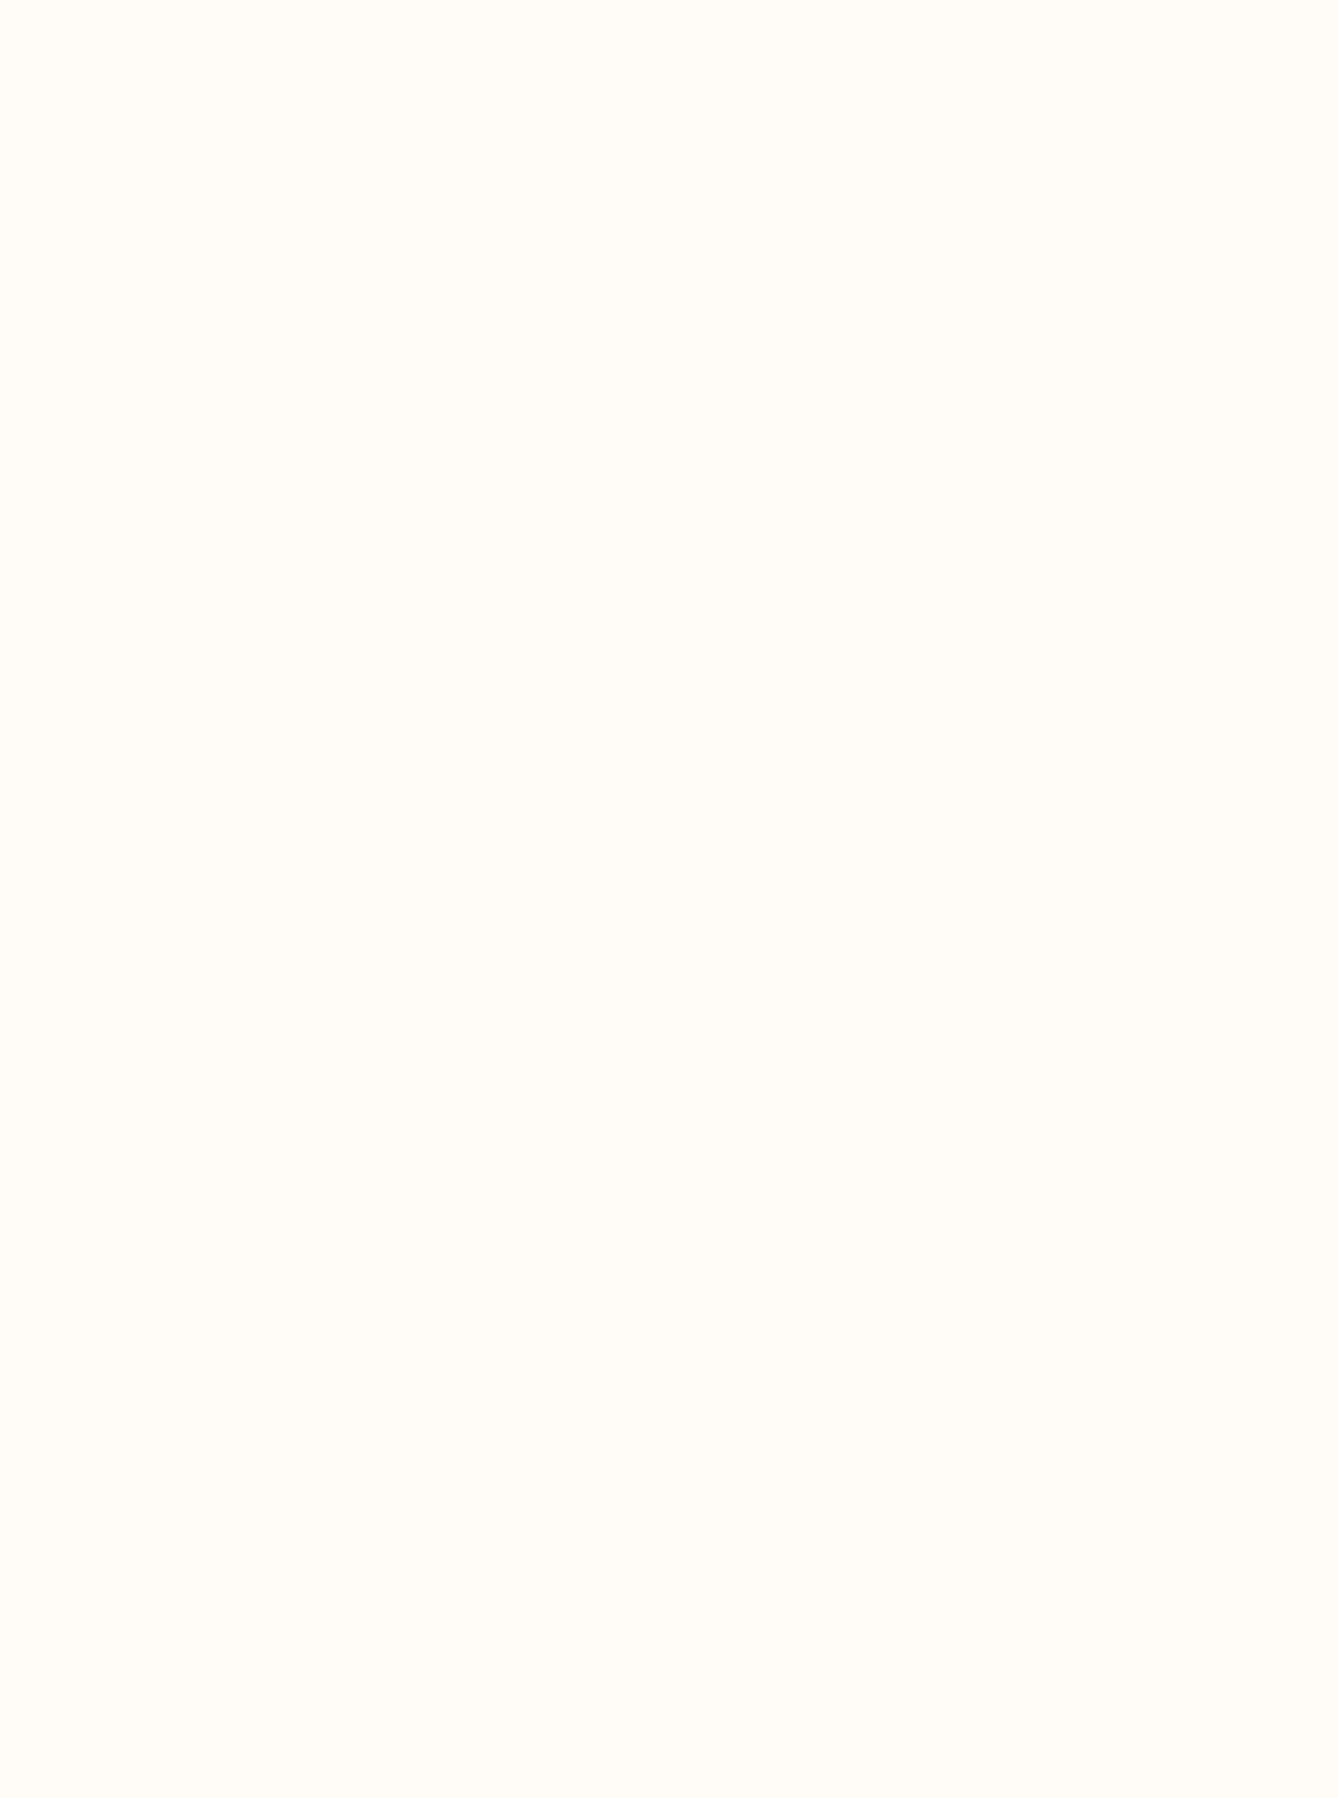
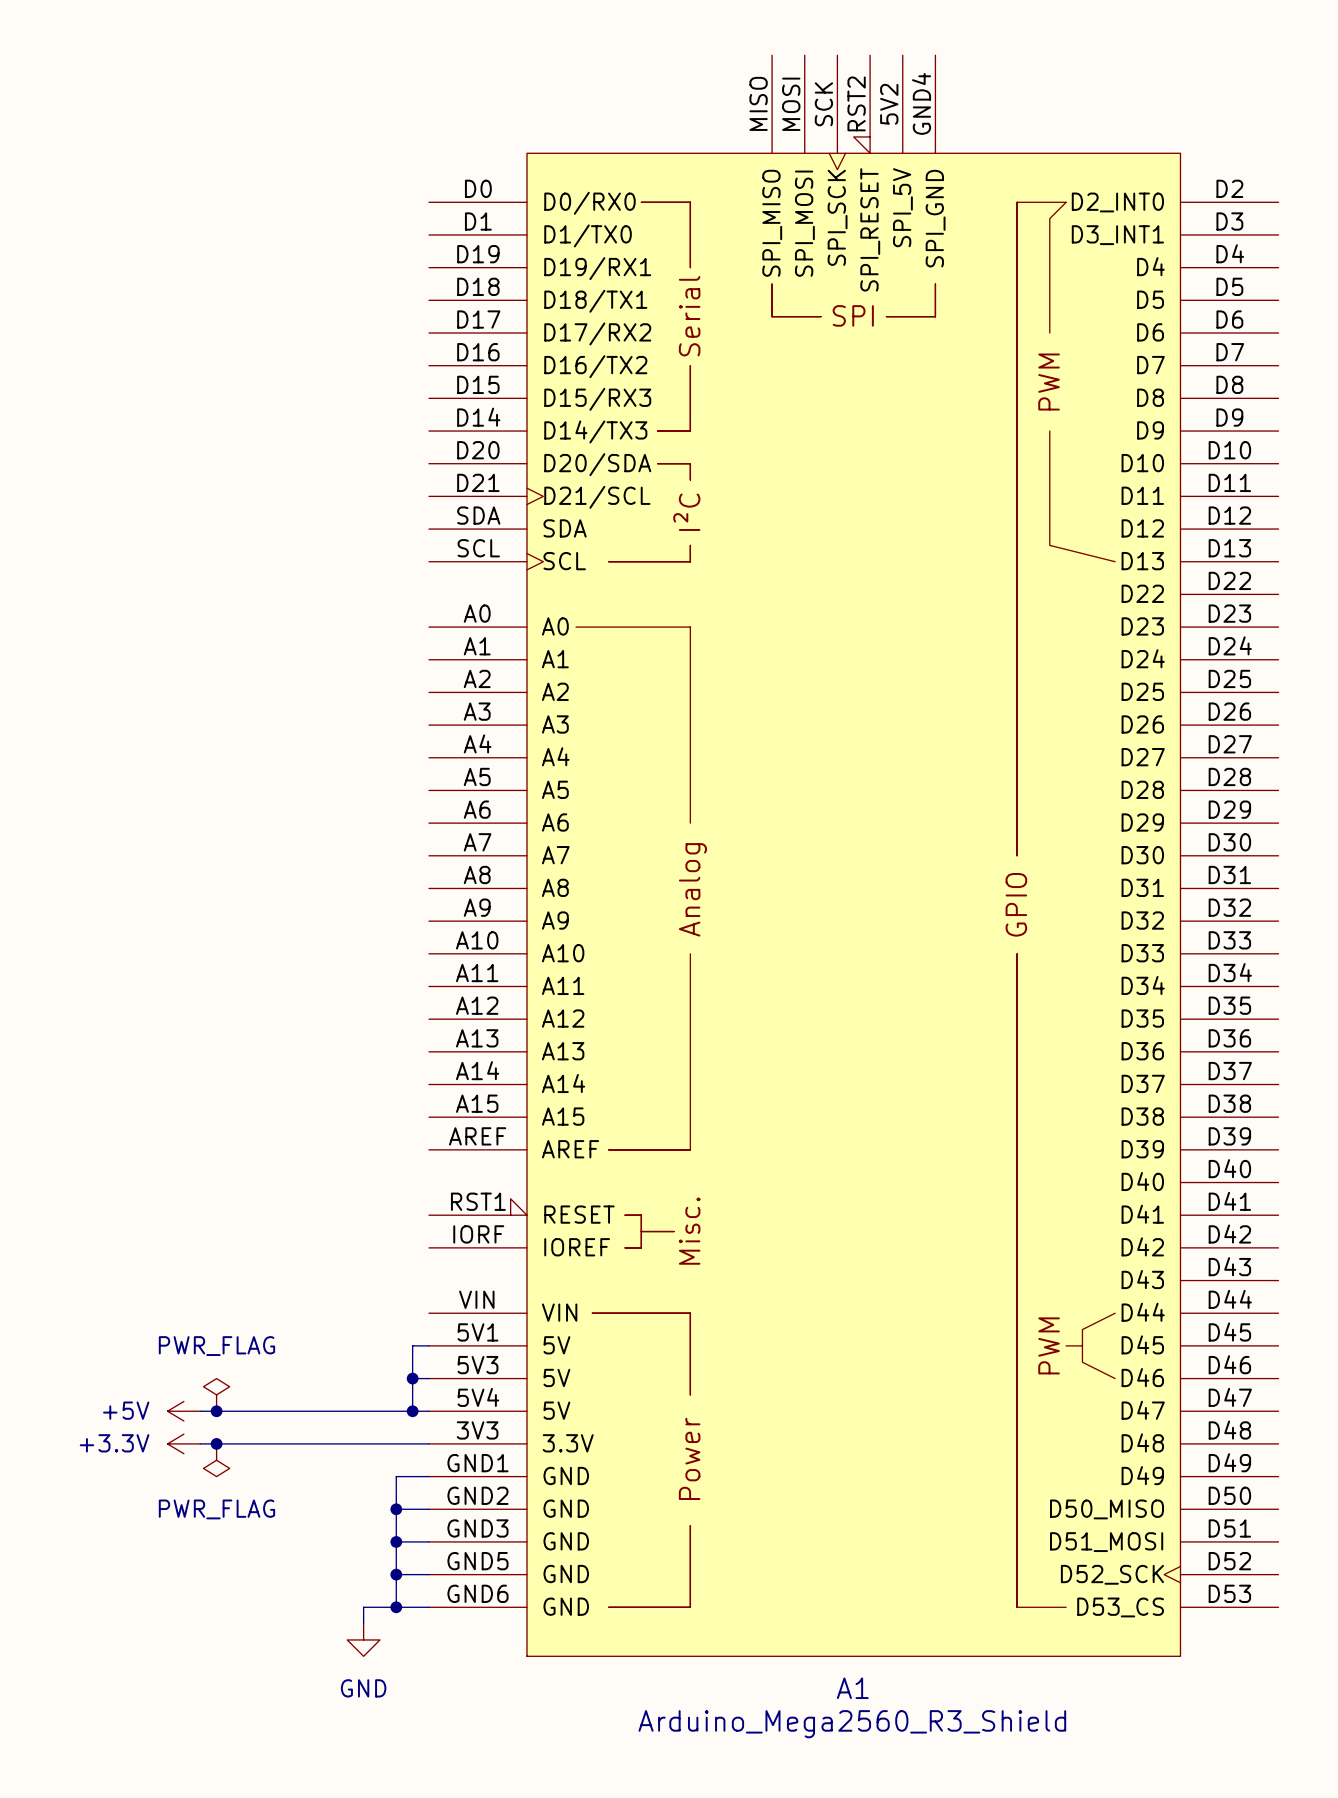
A1: none -> Arduino_Mega2560_R3_Shield (853, 855)
wire: none -> (428, 1345) (412, 1345) (412, 1411)
wire: none -> (412, 1378) (428, 1378)
junction: none -> (412, 1378)
power symbol: none -> PWR_FLAG (216, 1394)
power symbol: none -> +5V (183, 1411)
wire: none -> (200, 1411) (428, 1411)
junction: none -> (216, 1411)
junction: none -> (412, 1411)
power symbol: none -> +3.3V (183, 1443)
wire: none -> (200, 1443) (428, 1443)
junction: none -> (216, 1443)
power symbol: none -> PWR_FLAG (216, 1460)
wire: none -> (428, 1476) (396, 1476) (396, 1607)
wire: none -> (396, 1509) (428, 1509)
junction: none -> (396, 1509)
wire: none -> (396, 1541) (428, 1541)
junction: none -> (396, 1541)
wire: none -> (396, 1574) (428, 1574)
junction: none -> (396, 1574)
junction: none -> (396, 1607)
wire: none -> (428, 1607) (363, 1607) (363, 1623)
power symbol: none -> GND (363, 1639)

